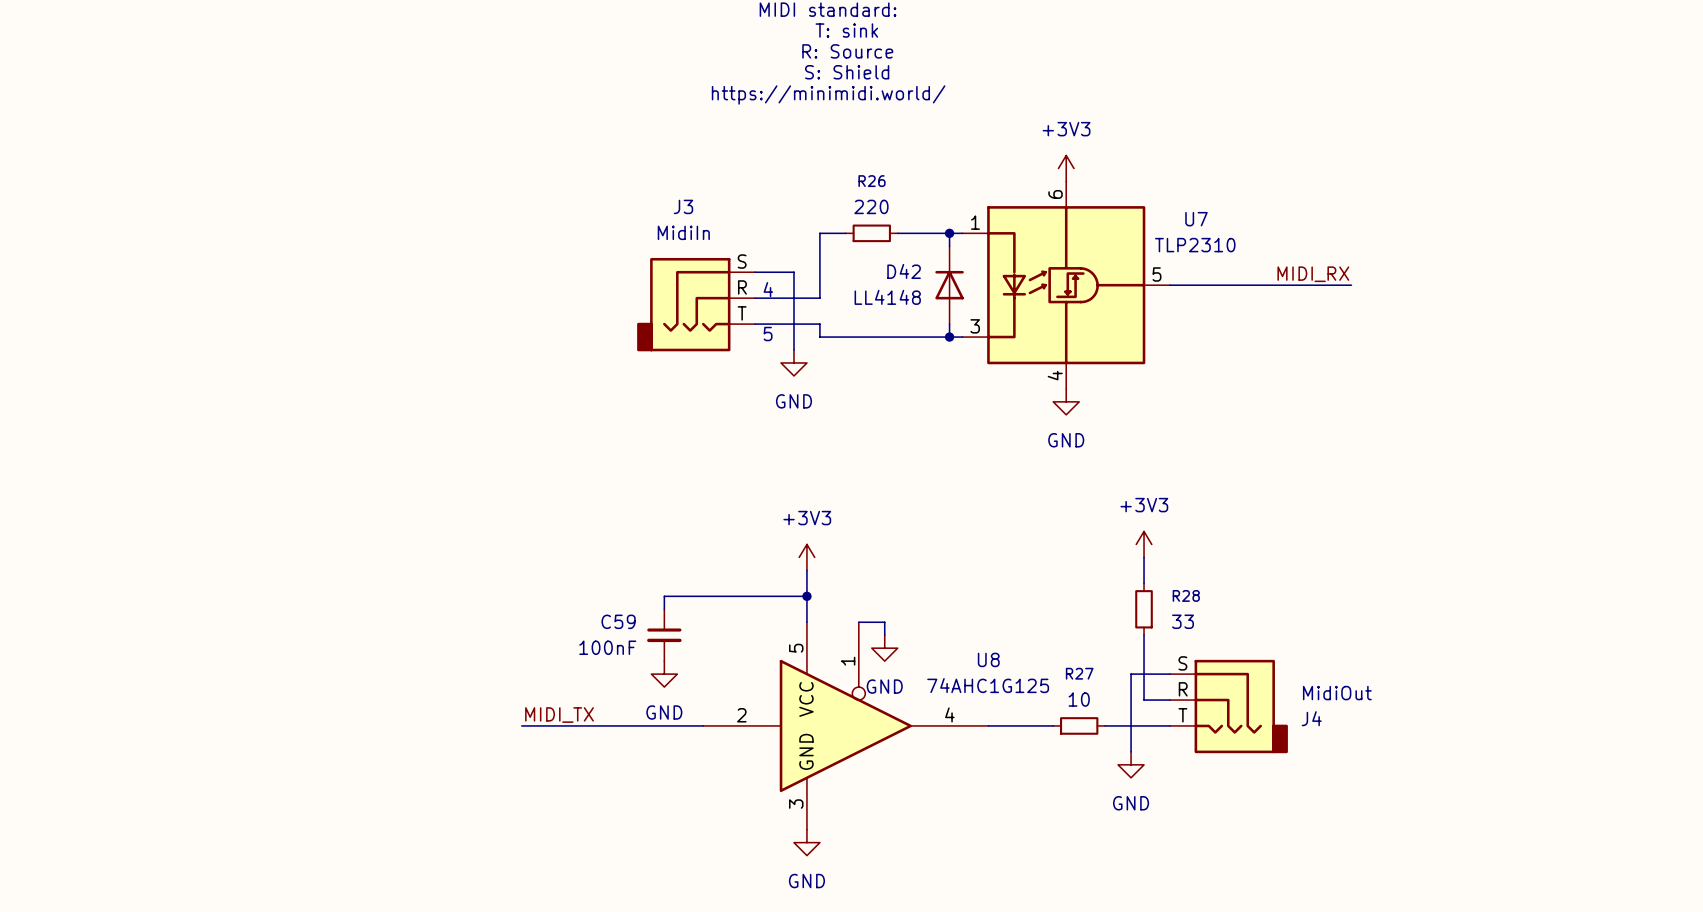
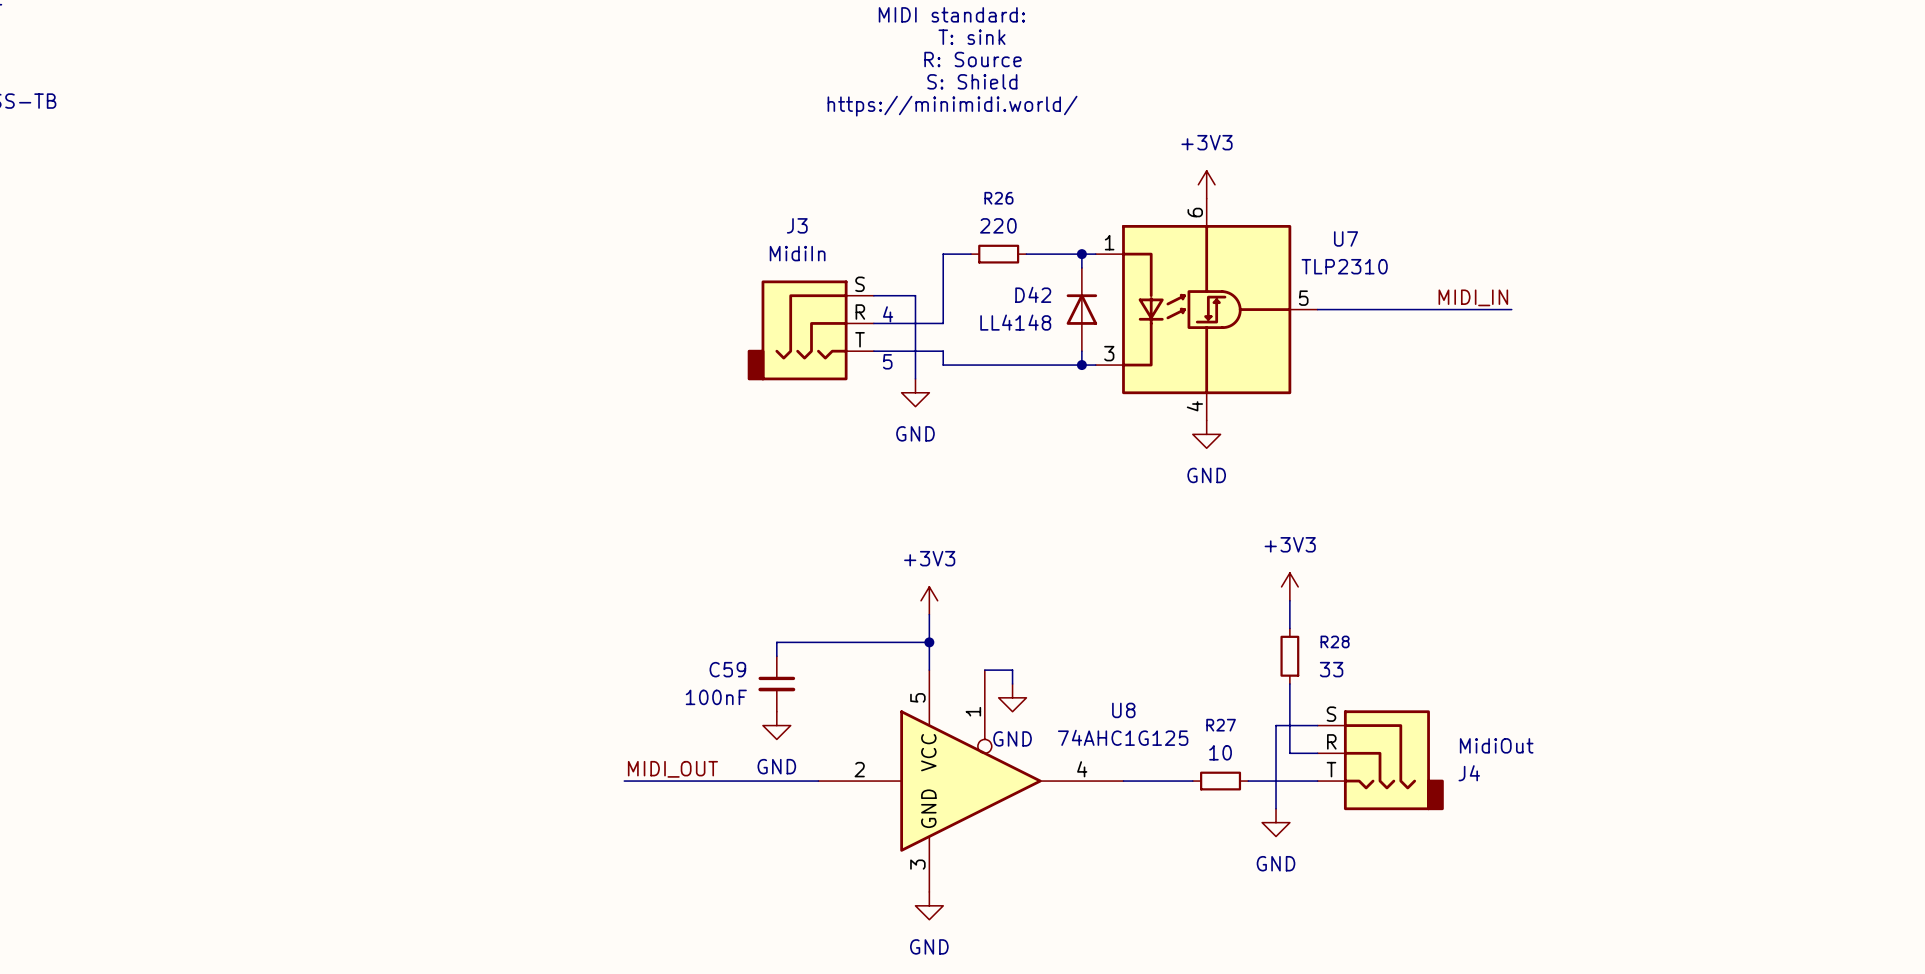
label: MIDI_RX (1313, 274) -> MIDI_IN (1473, 297)
label: MIDI_TX (559, 715) -> MIDI_OUT (672, 769)

